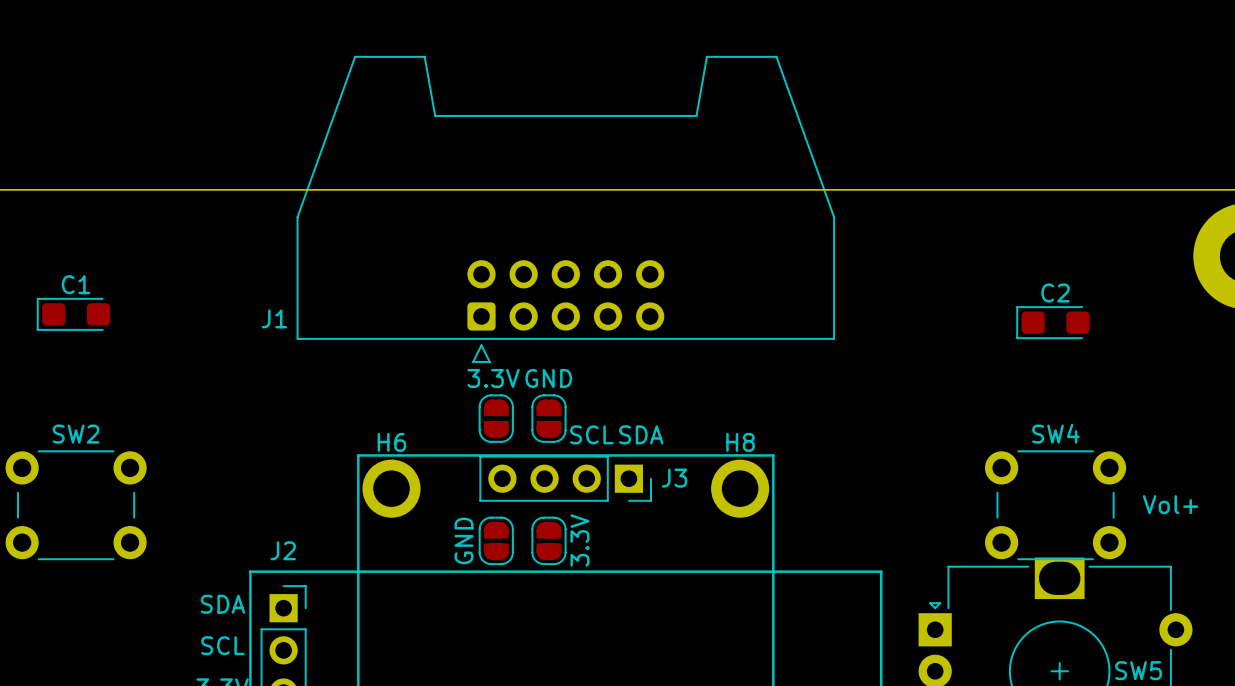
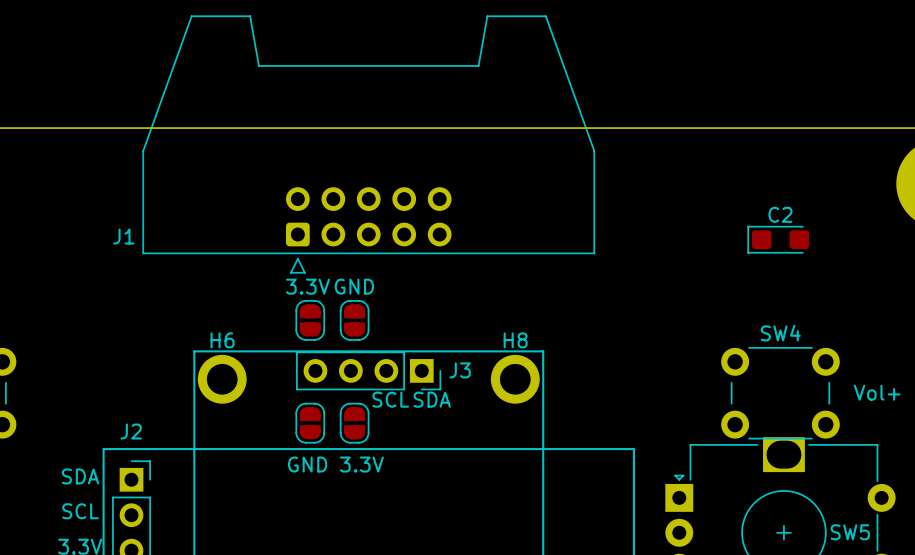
text position: SCL (591, 434) -> SCL (390, 399)
text position: SDA (641, 434) -> SDA (432, 399)
GND name: GND (464, 540) -> none
3.3V name: 3.3V (579, 540) -> none
GND value: none -> GND (307, 464)
3.3V value: none -> 3.3V (361, 464)

